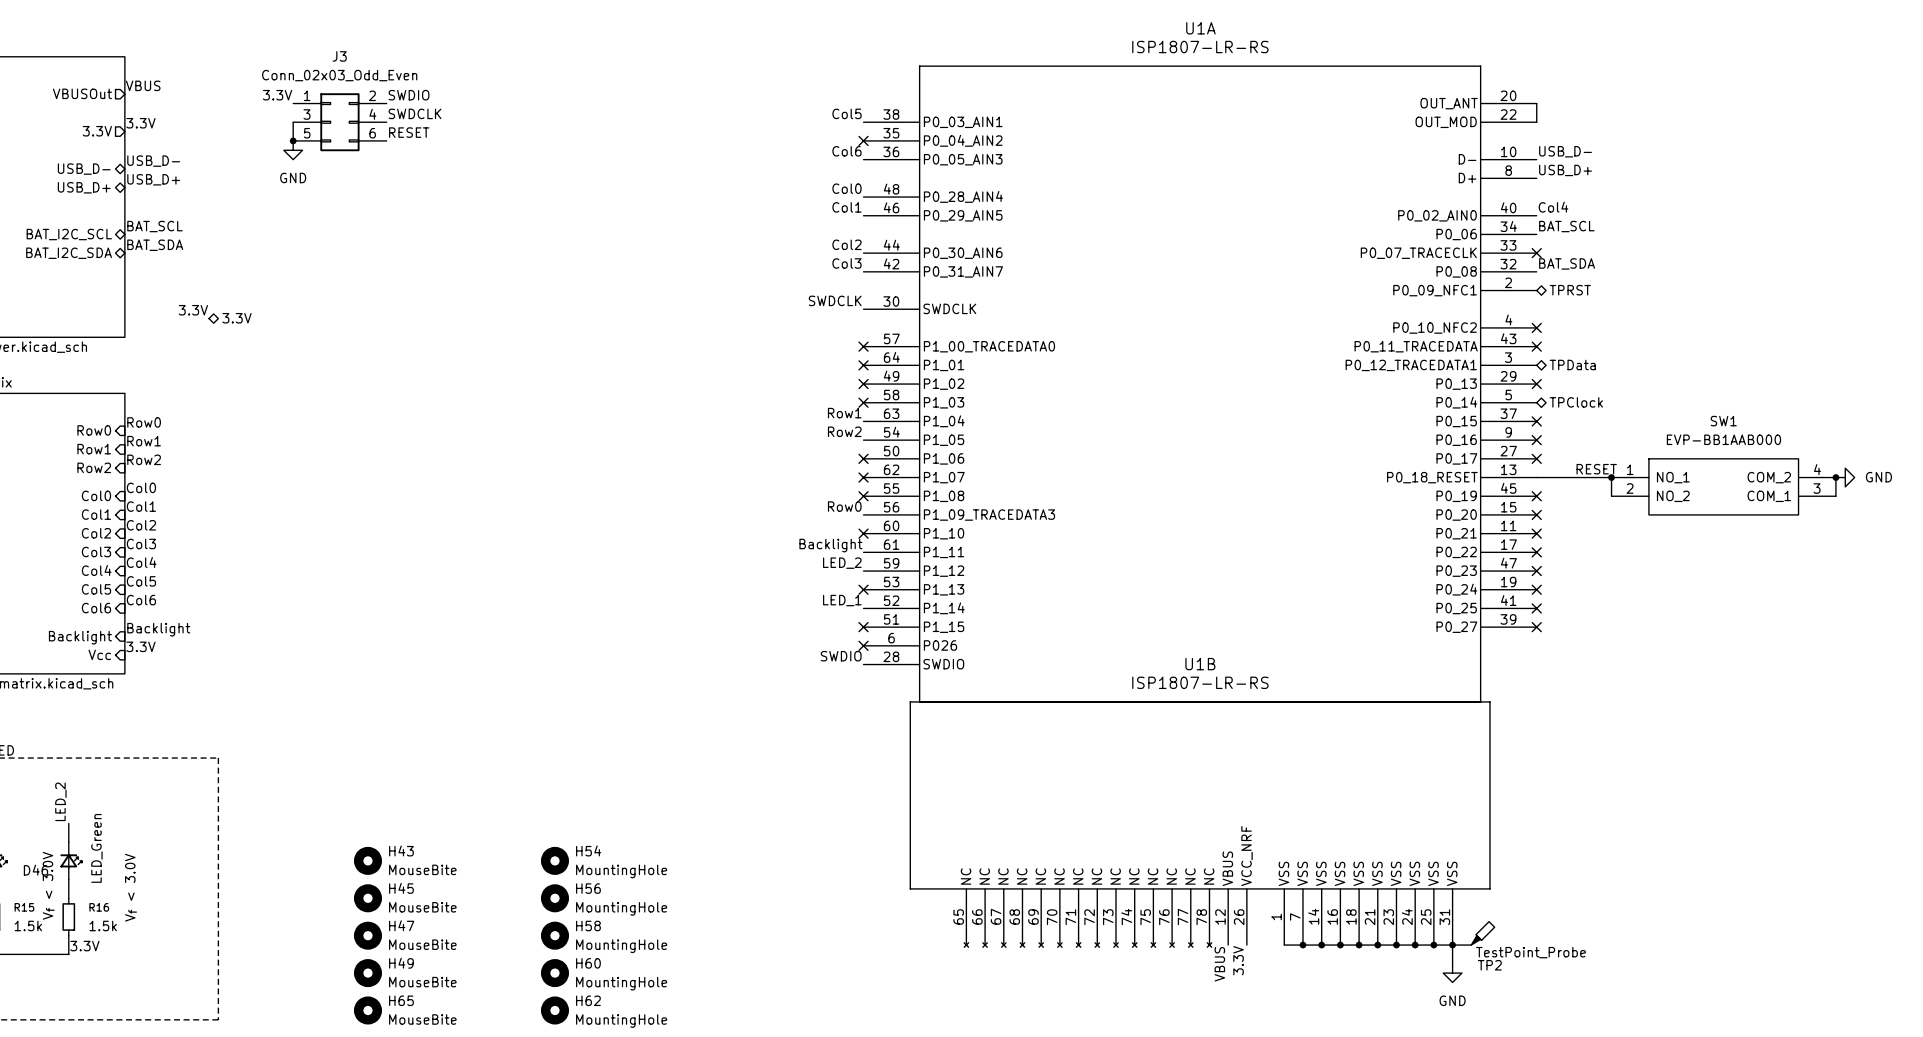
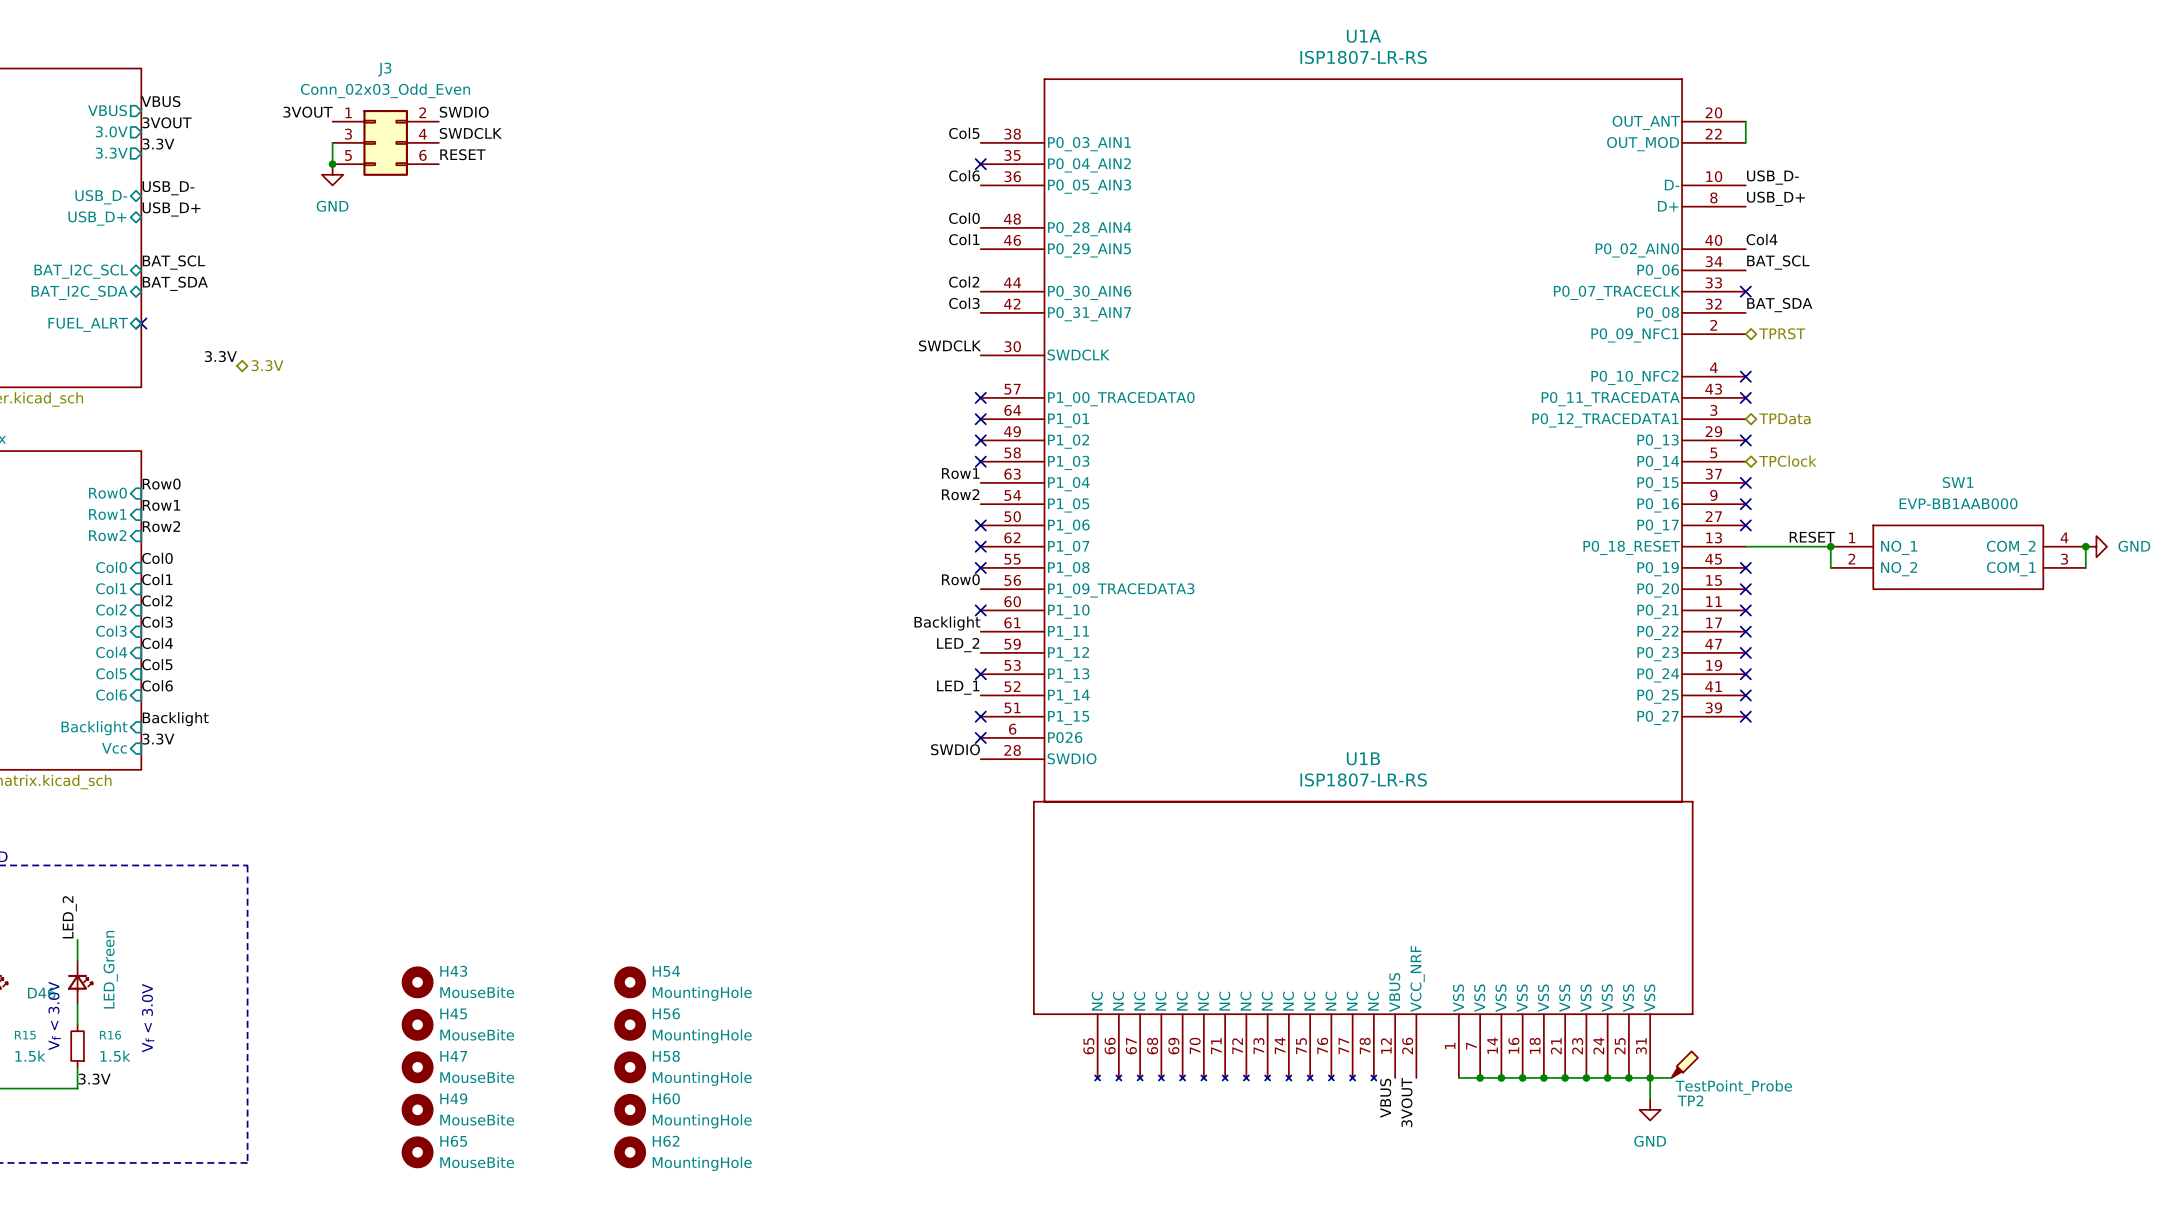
sheet pin: VBUSOut (82, 93) -> VBUS (107, 110)
label: 3.3V (277, 95) -> 3VOUT (308, 112)
label: none -> 3VOUT (167, 122)
sheet pin: none -> 3.0V (111, 131)
sheet pin: none -> FUEL_ALRT (88, 324)
no-connect mark: none -> (141, 323)
label: 3.3V (1238, 960) -> 3VOUT (1406, 1102)

